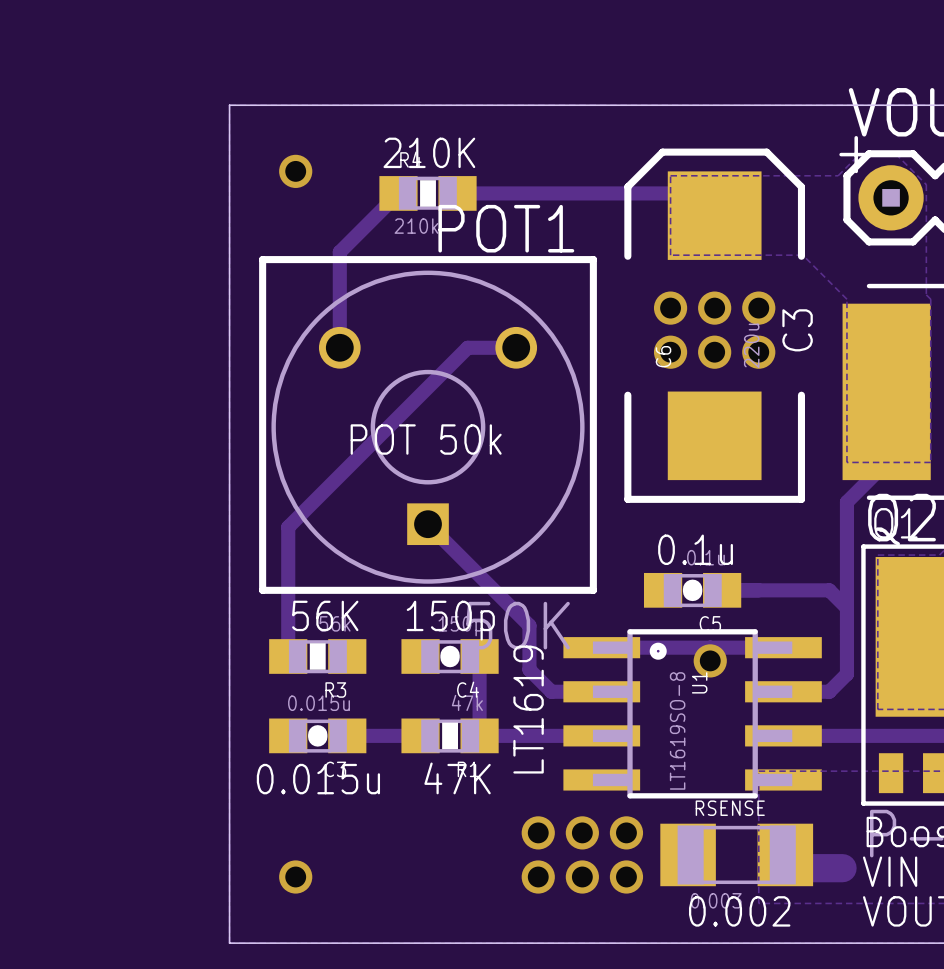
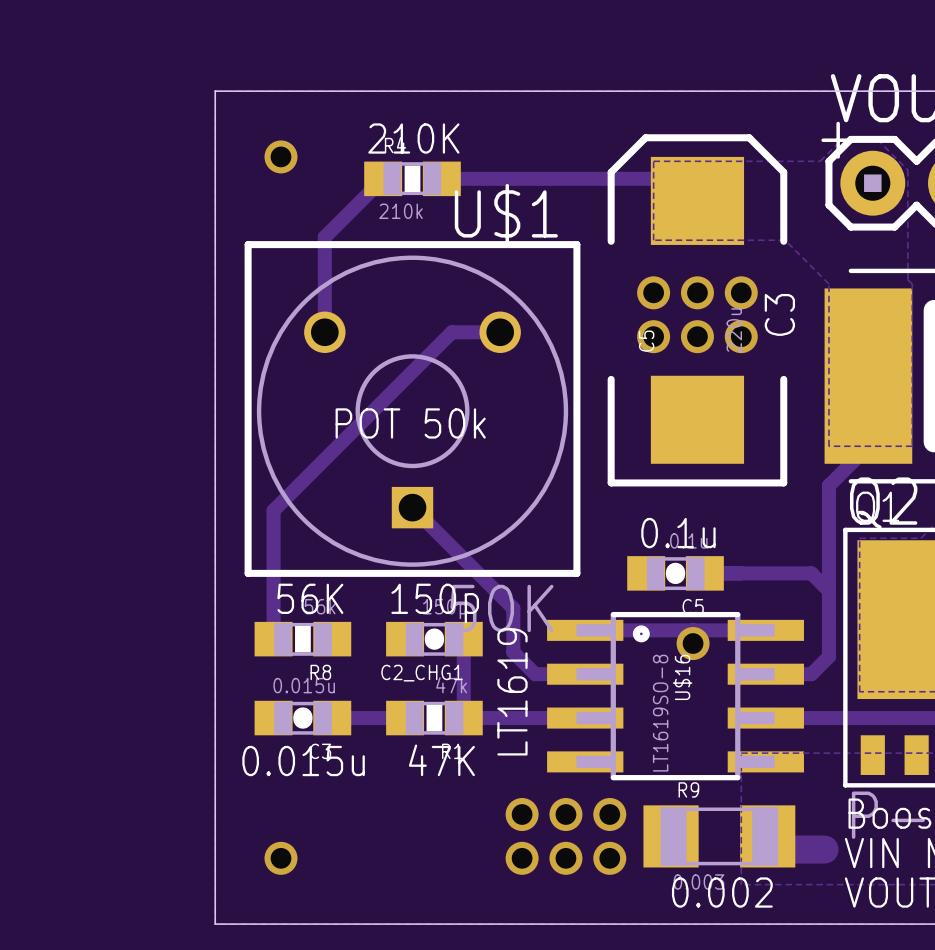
POT1 name: POT1 (506, 228) -> U$1 (506, 213)
C6 name: C6 (663, 356) -> C5 (646, 341)
U1 name: U1 (699, 682) -> U$16 (682, 677)
C4 name: C4 (468, 689) -> C2_CHG1 (421, 673)
R3 name: R3 (335, 690) -> R8 (320, 672)
RSENSE name: RSENSE (730, 808) -> R9 (688, 789)

